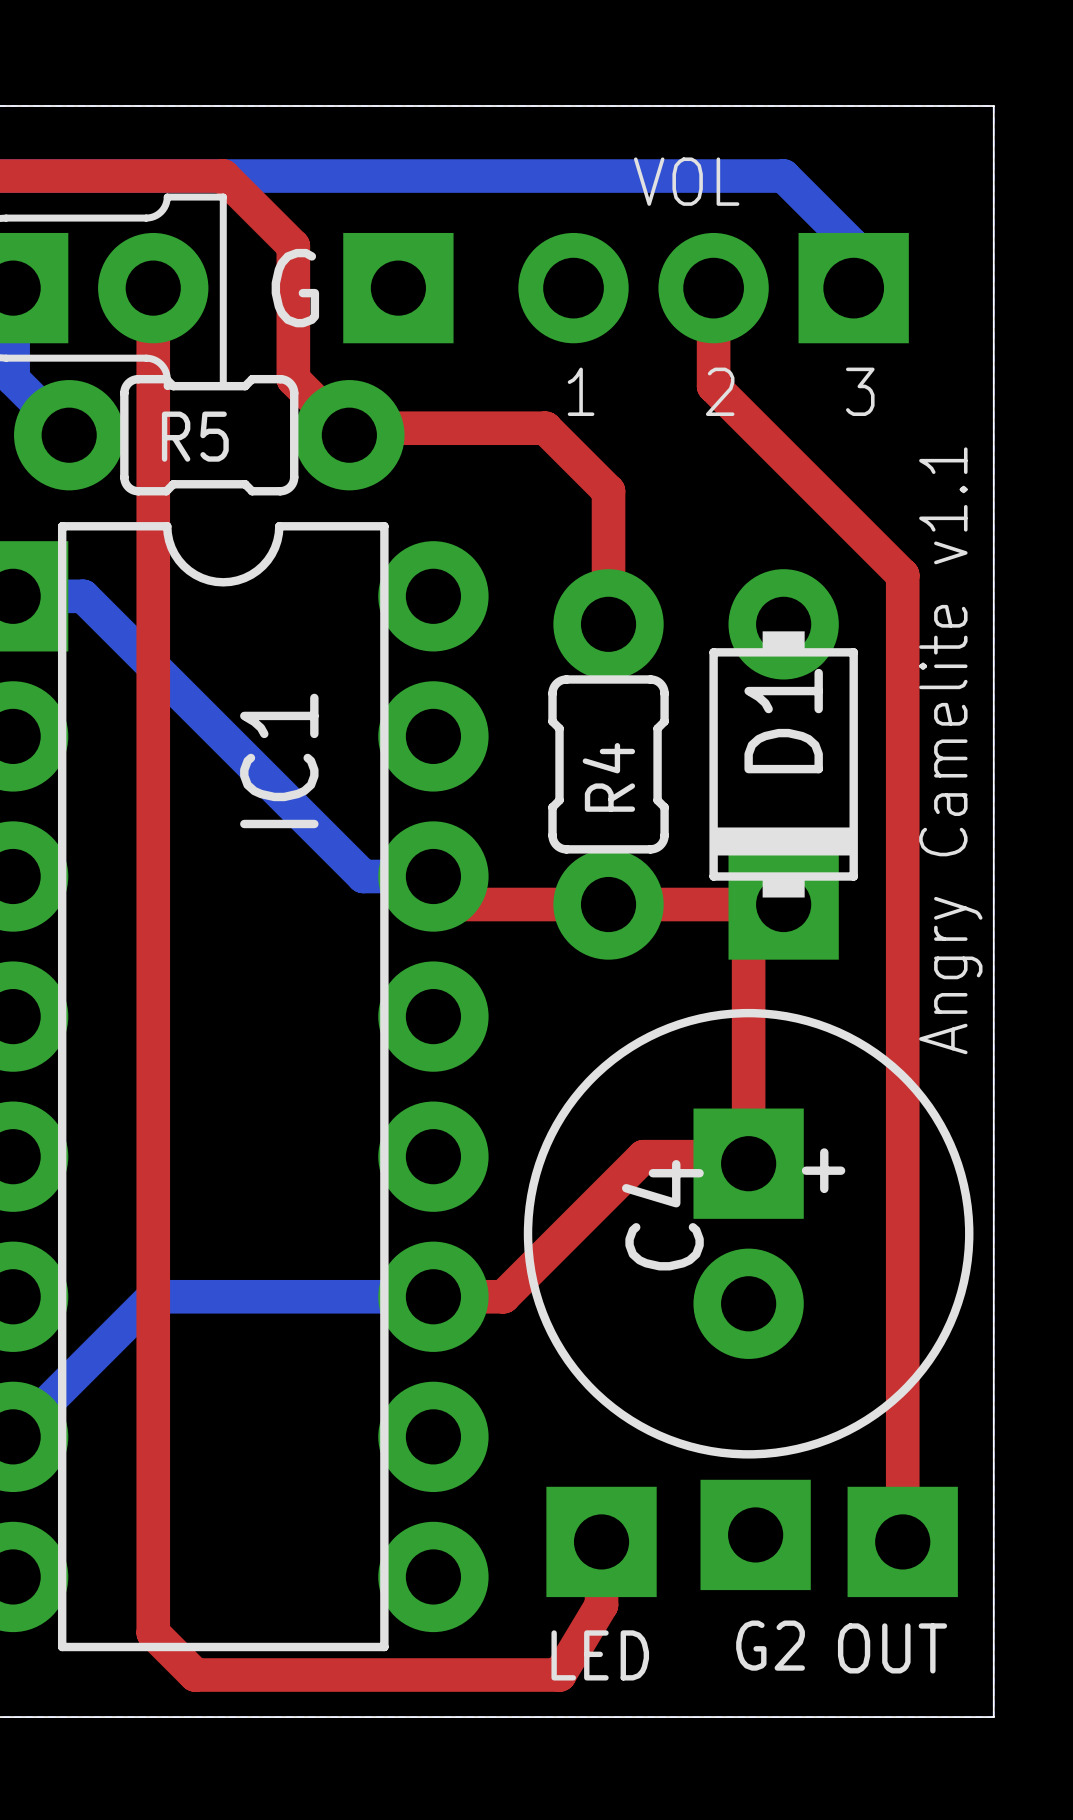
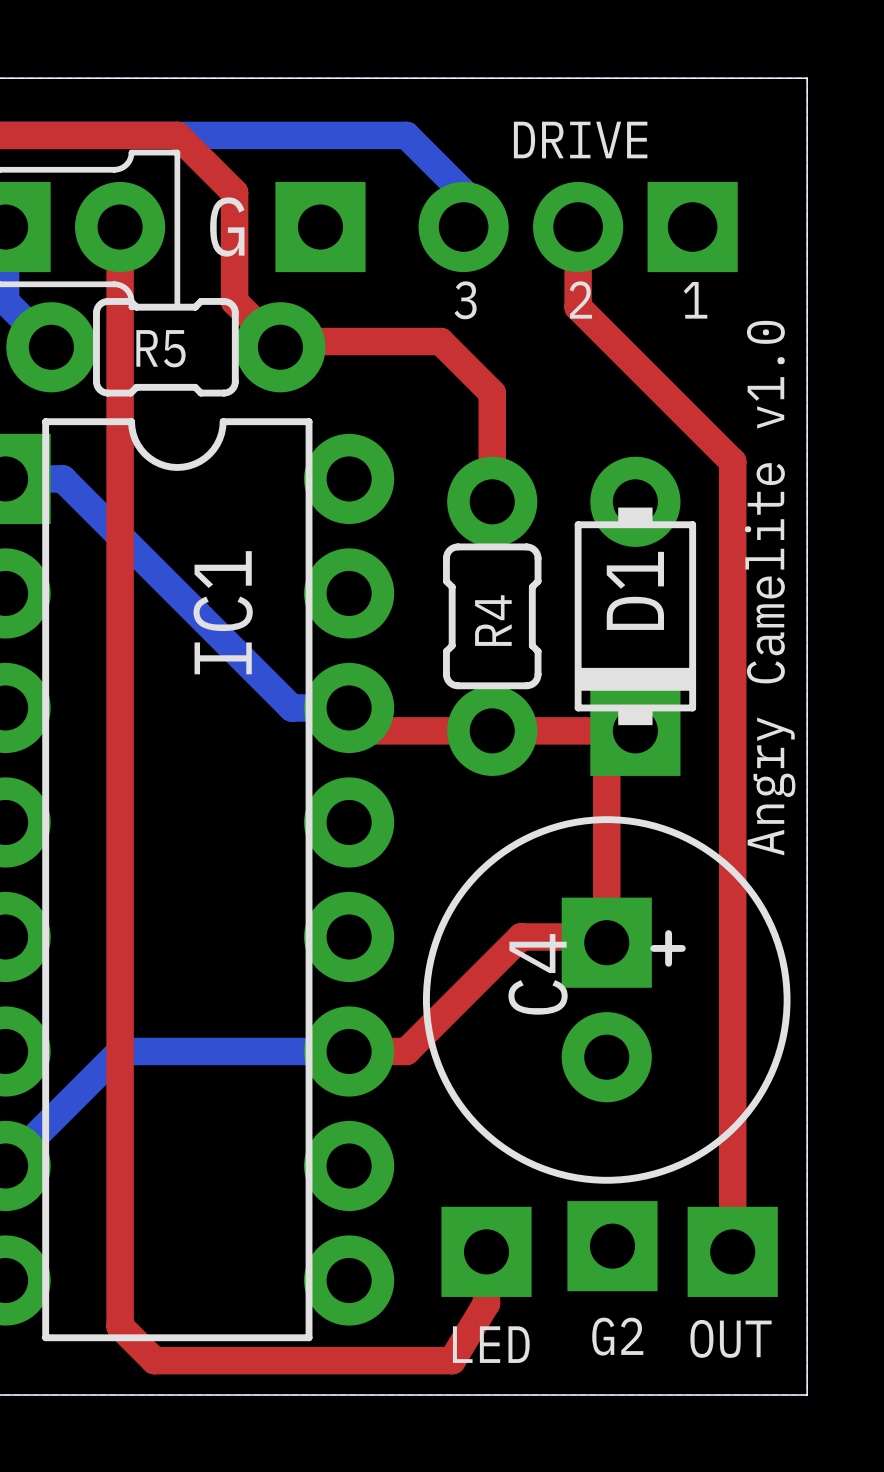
bottom track: (503, 176) (783, 176) (853, 246) (853, 288) -> (406, 135) (463, 192) (463, 227)
text: VOL (686, 181) -> DRIVE (580, 140)
part text: none -> 3 (465, 300)
part text: none -> 2 (580, 300)
part text: none -> 1 (695, 300)
text: 1 (581, 391) -> none
text: 2 (720, 391) -> none
text: 3 (860, 391) -> none
text: Angry Camelite v1.1 (950, 750) -> Angry Camelite v1.0 (770, 588)

